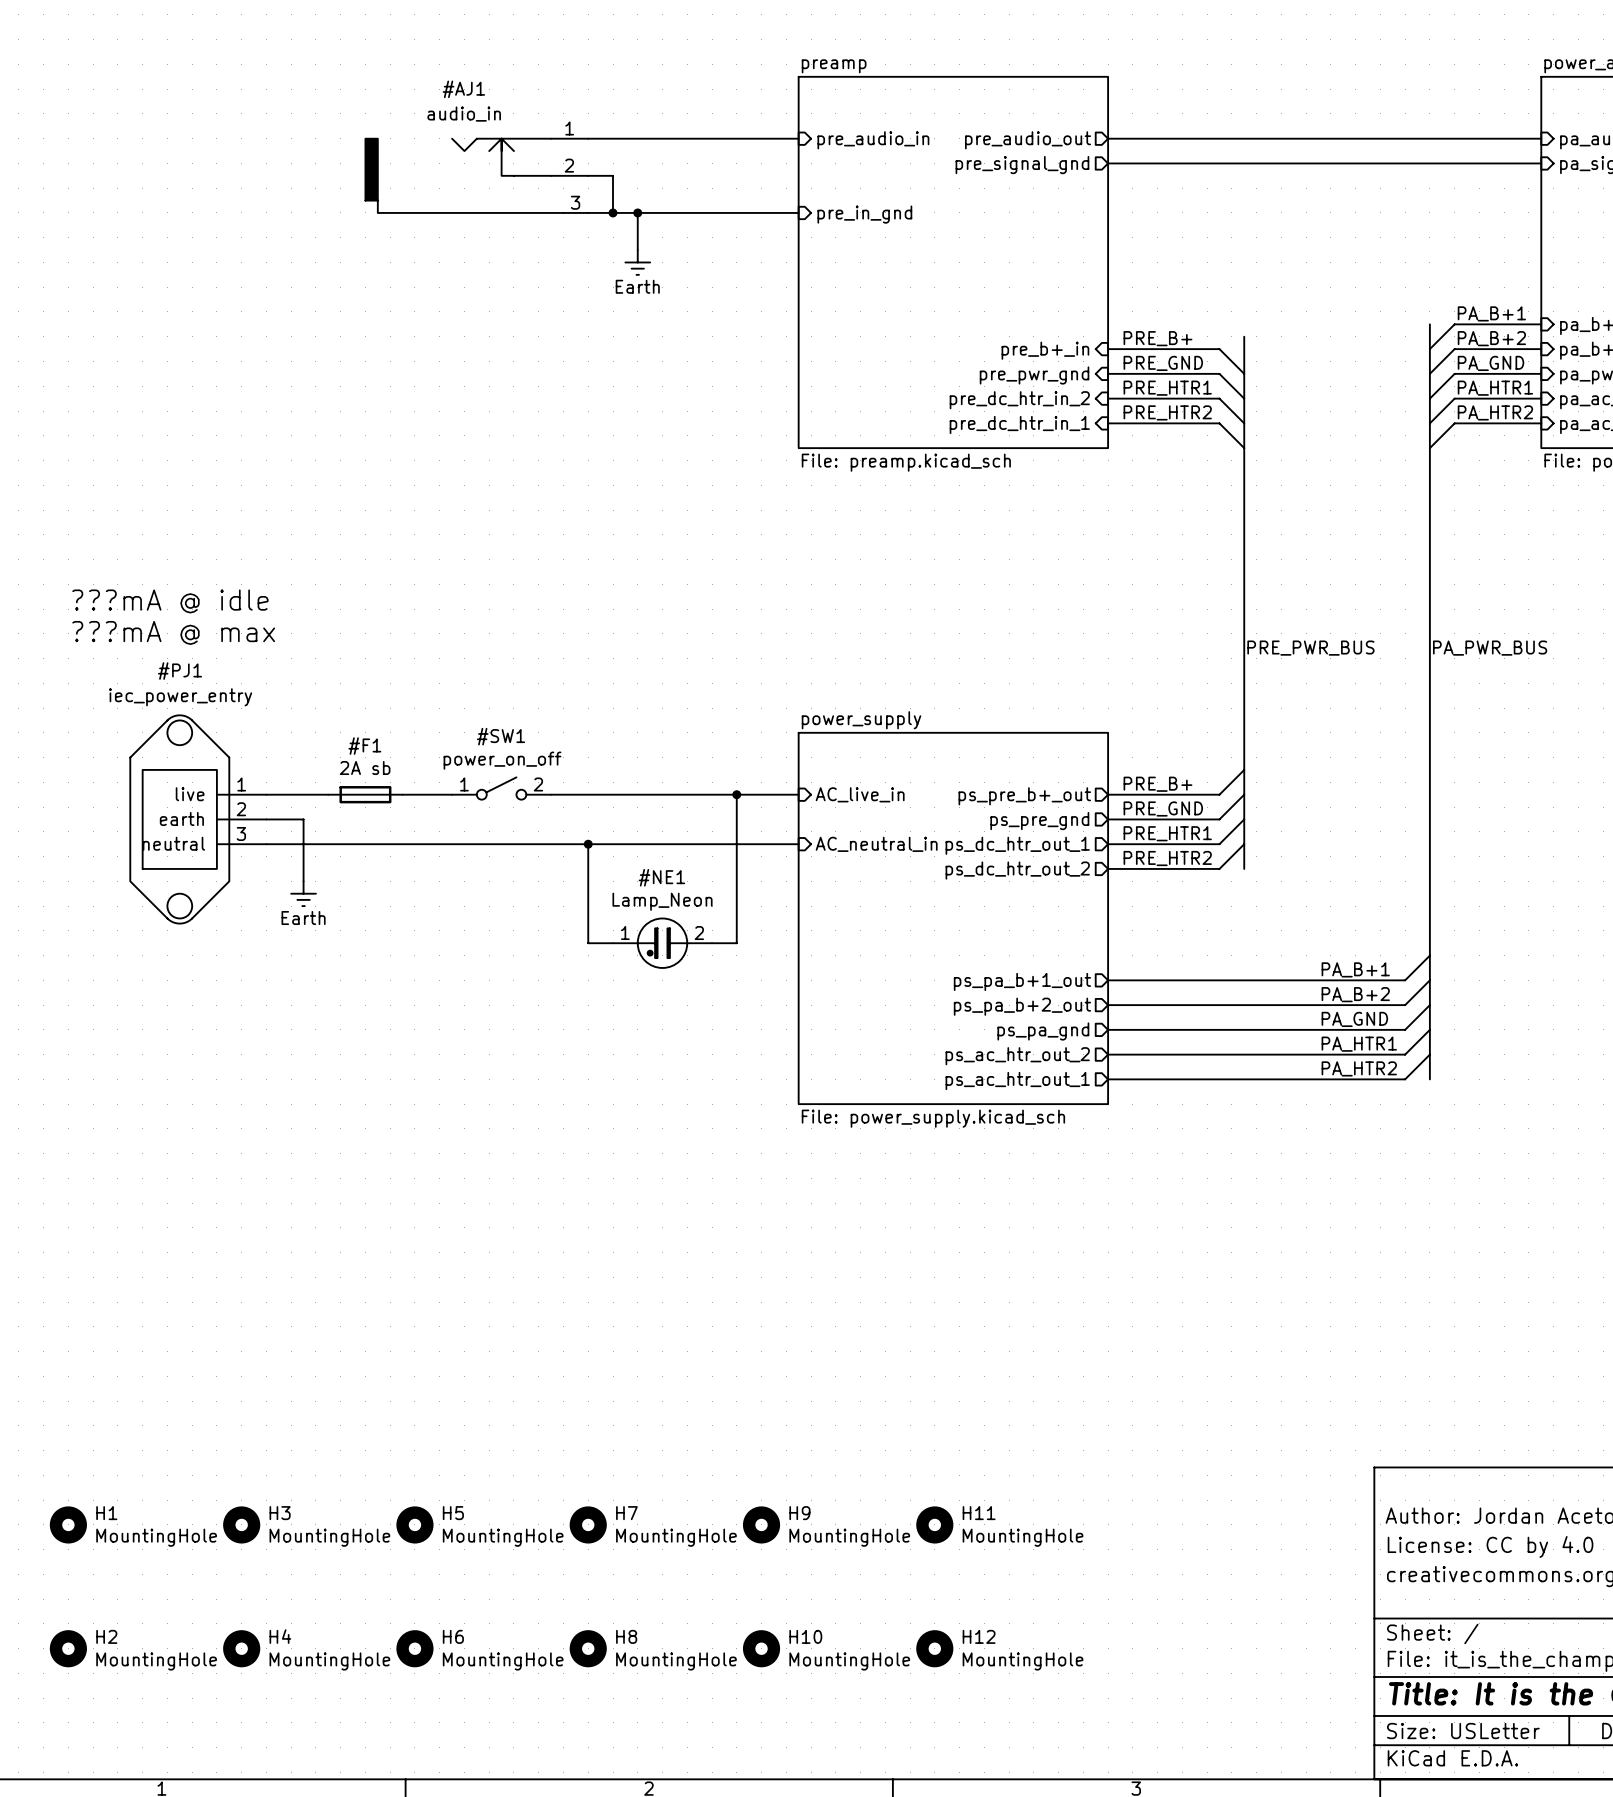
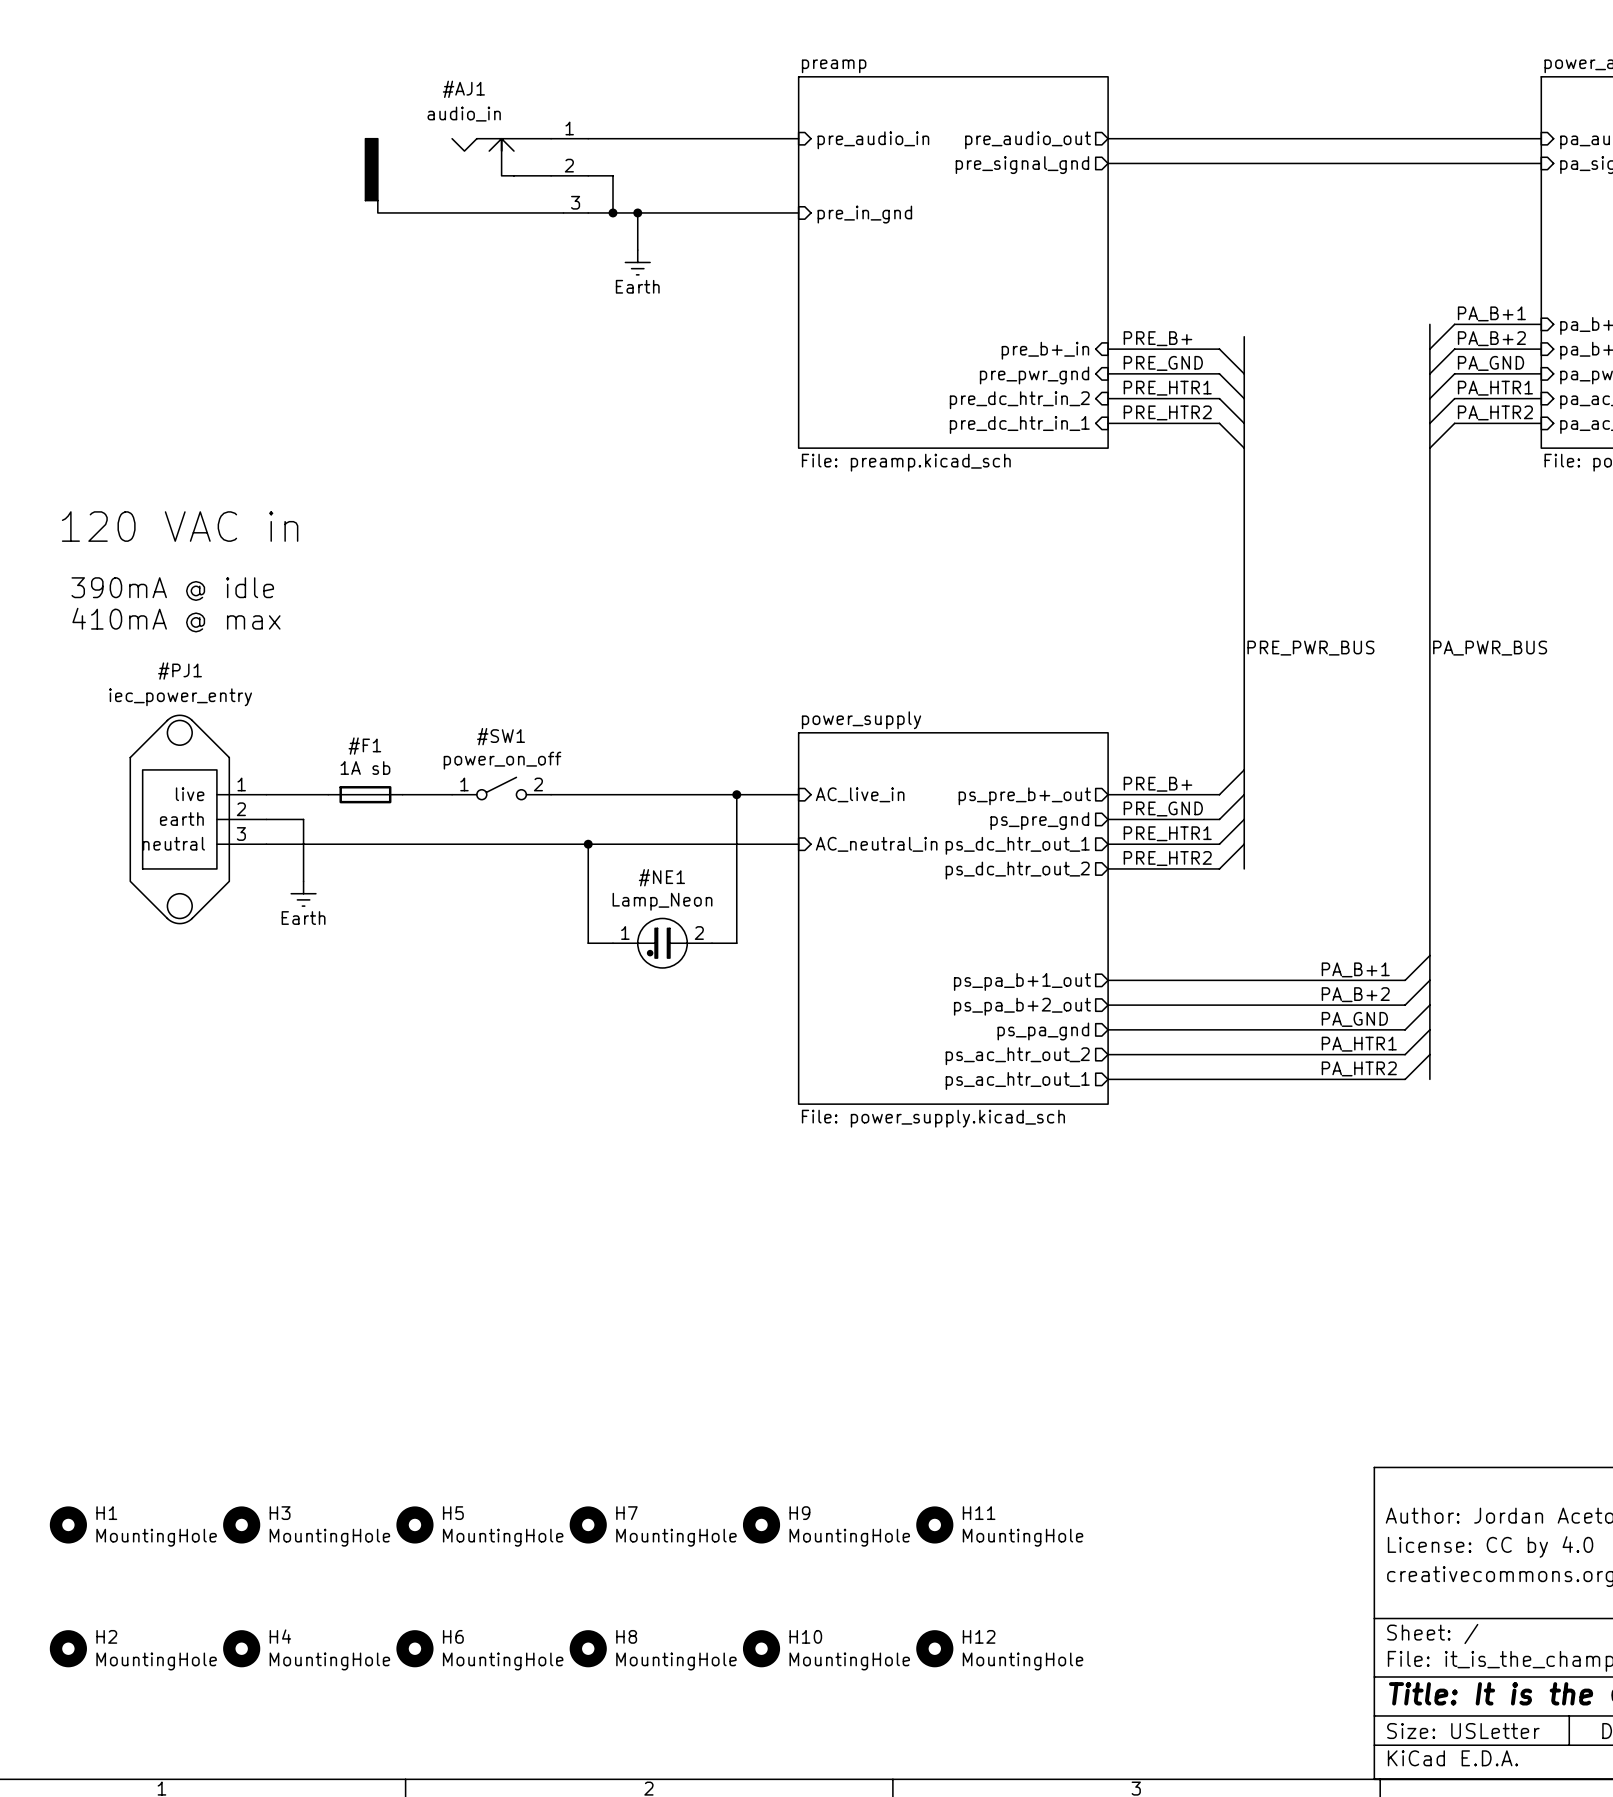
text: none -> 120 VAC in (180, 526)
text: ???mA @ idle (170, 601) -> 390mA @ idle (172, 589)
text: ???mA @ max (173, 632) -> 410mA @ max (176, 620)
power symbol: 2A sb (365, 794) -> 1A sb (365, 794)

